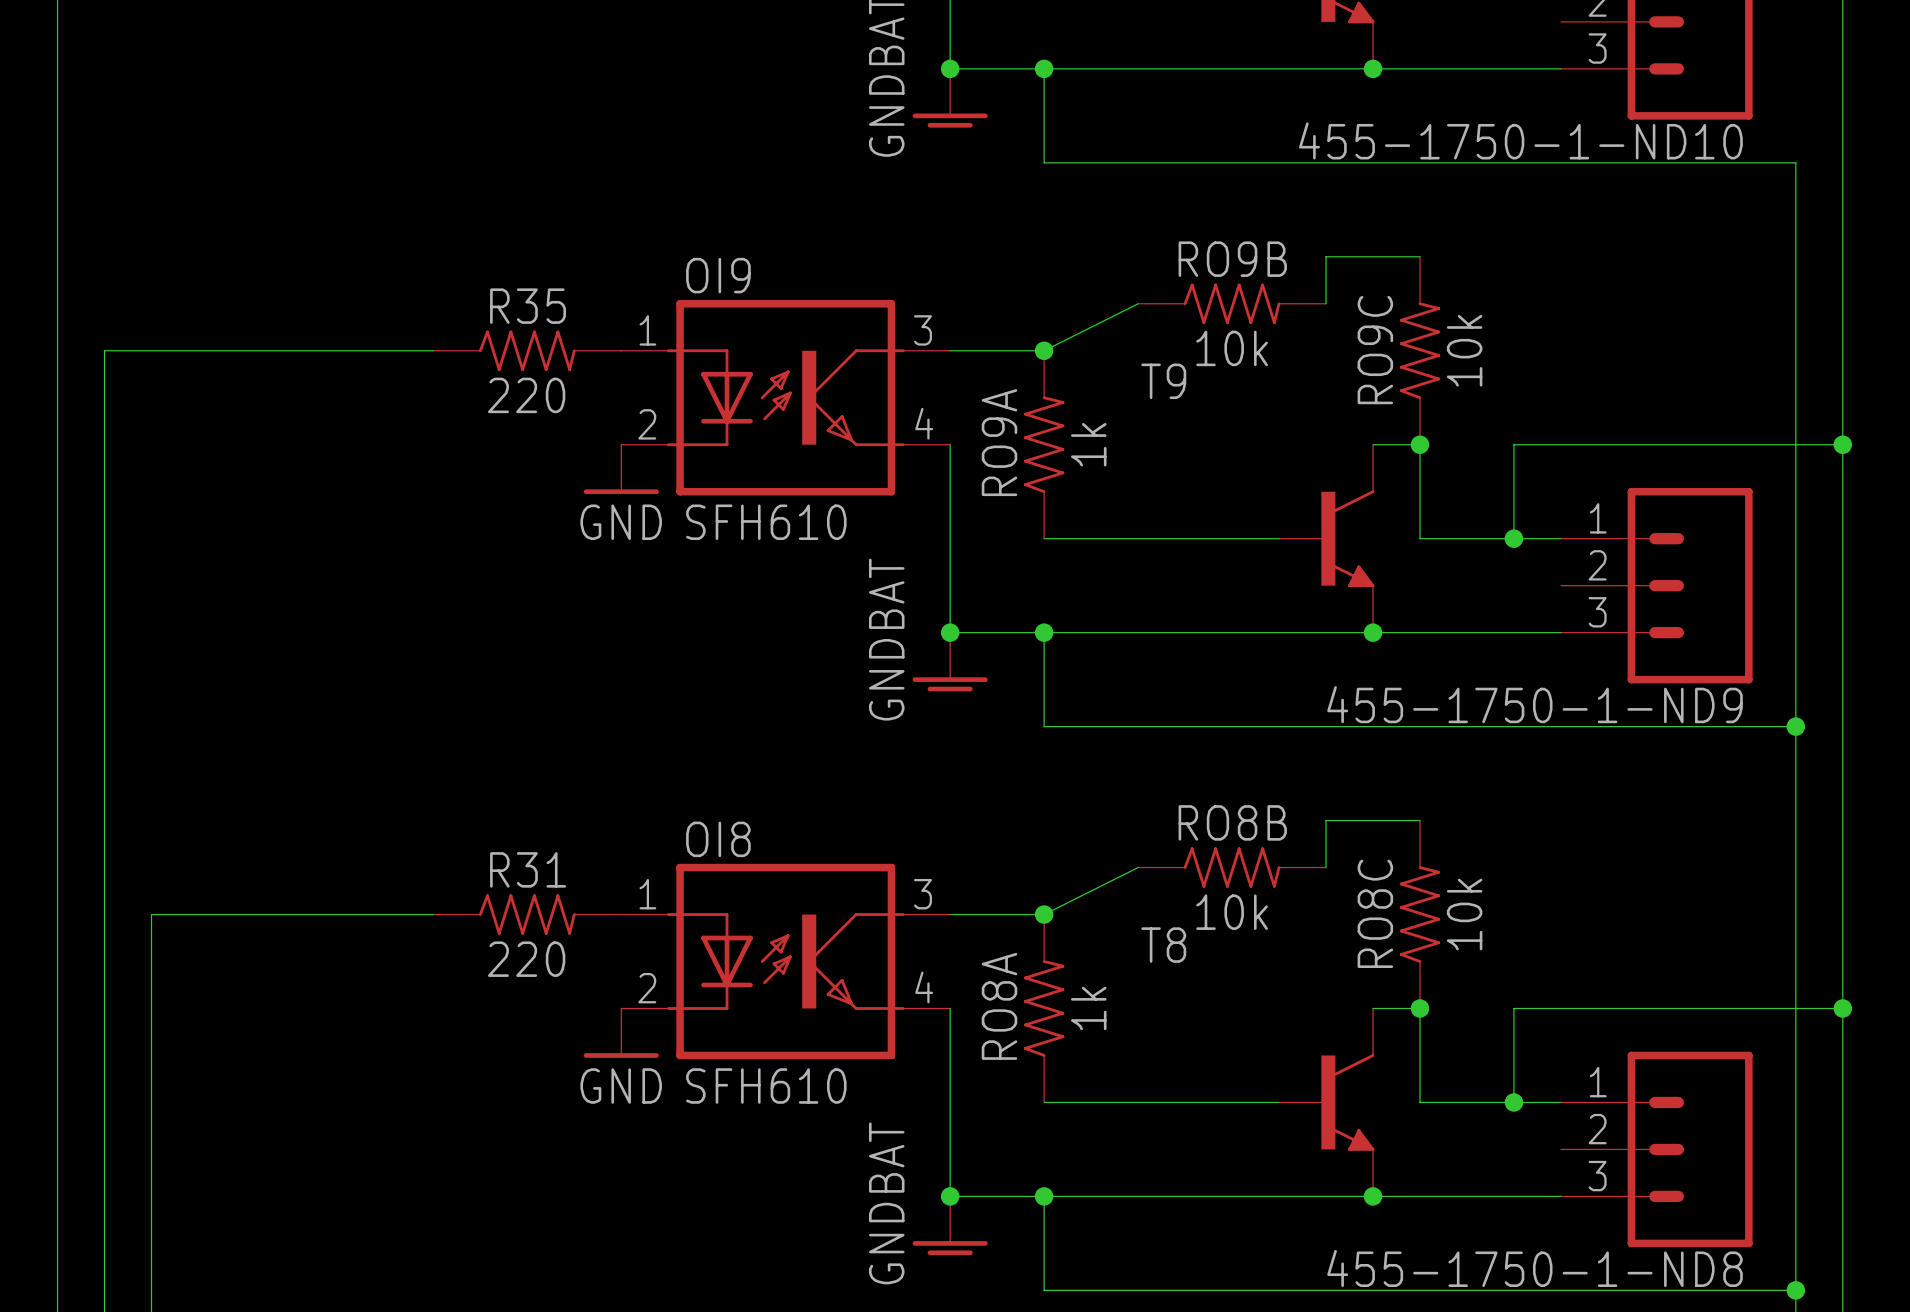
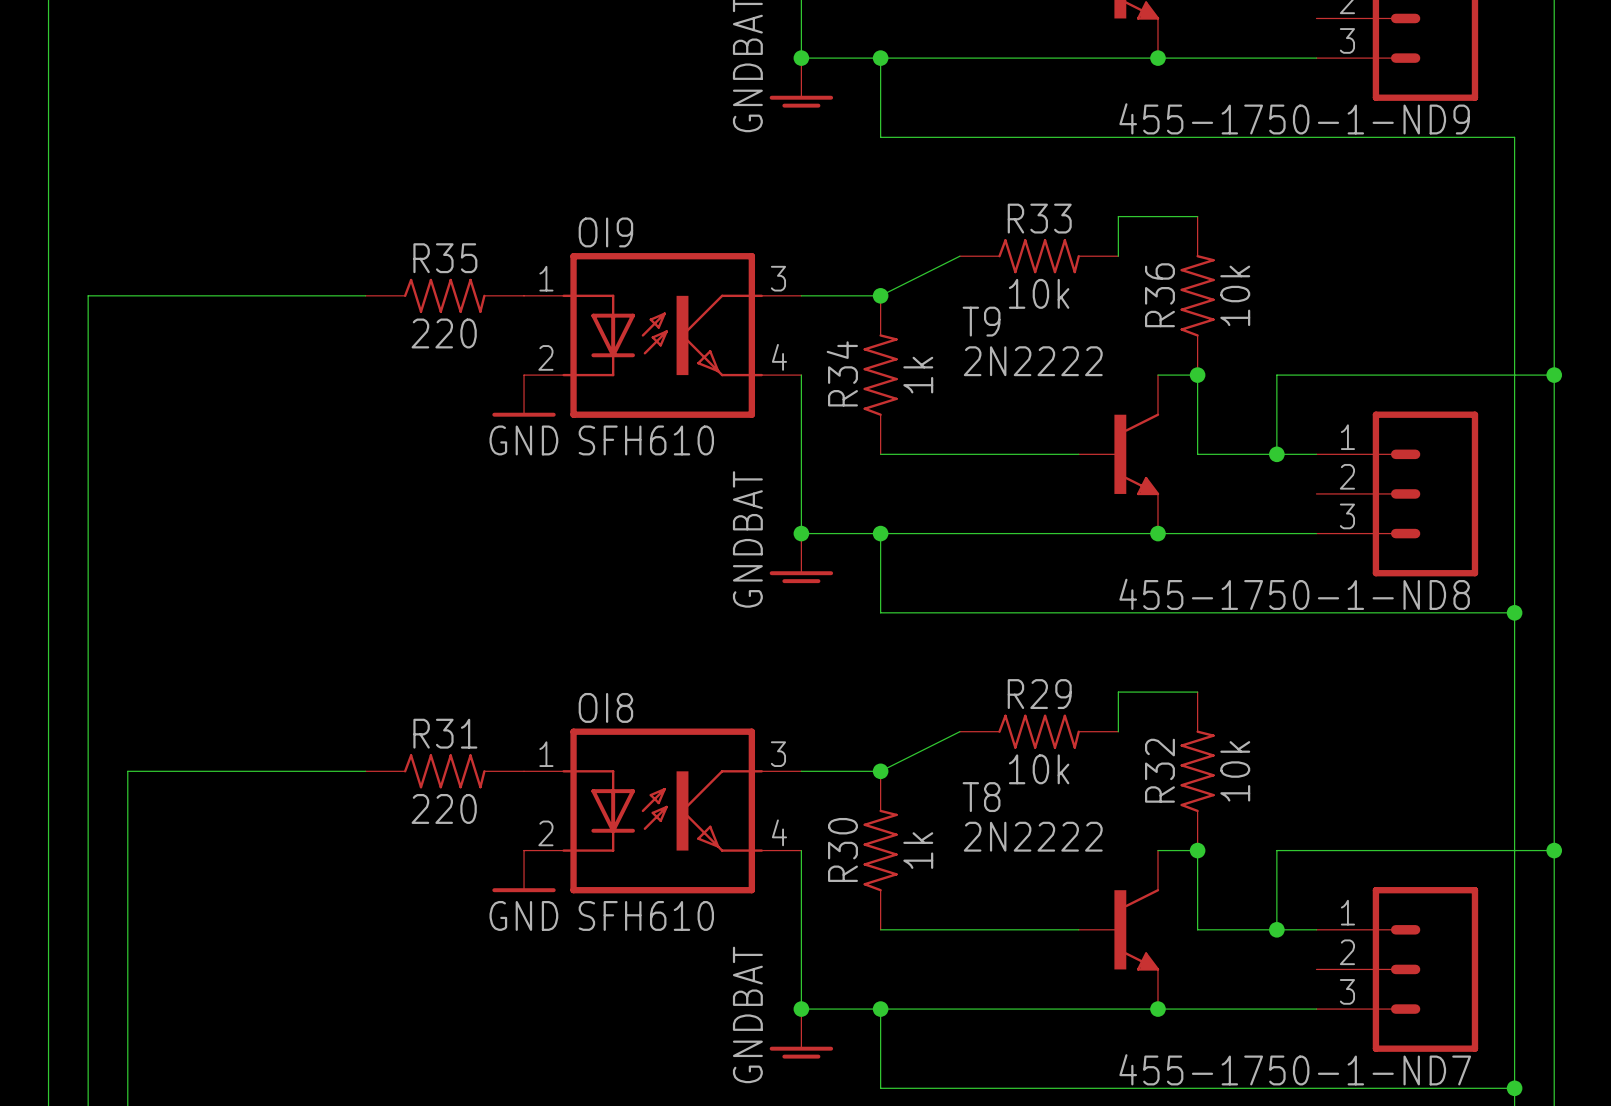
455-1750-1-ND10 name: 455-1750-1-ND10 (1520, 140) -> 455-1750-1-ND9 (1294, 118)
RO9B name: RO9B (1232, 259) -> R33 (1039, 218)
RO9C name: RO9C (1375, 350) -> R36 (1159, 295)
T9 value: none -> 2N2222 (1033, 361)
RO9A name: RO9A (999, 442) -> R34 (842, 373)
455-1750-1-ND9 name: 455-1750-1-ND9 (1534, 704) -> 455-1750-1-ND8 (1294, 594)
RO8B name: RO8B (1232, 822) -> R29 (1039, 694)
RO8C name: RO8C (1375, 913) -> R32 (1159, 770)
T8 value: none -> 2N2222 (1033, 836)
RO8A name: RO8A (999, 1006) -> R30 (842, 849)
455-1750-1-ND8 name: 455-1750-1-ND8 (1534, 1268) -> 455-1750-1-ND7 (1295, 1069)

